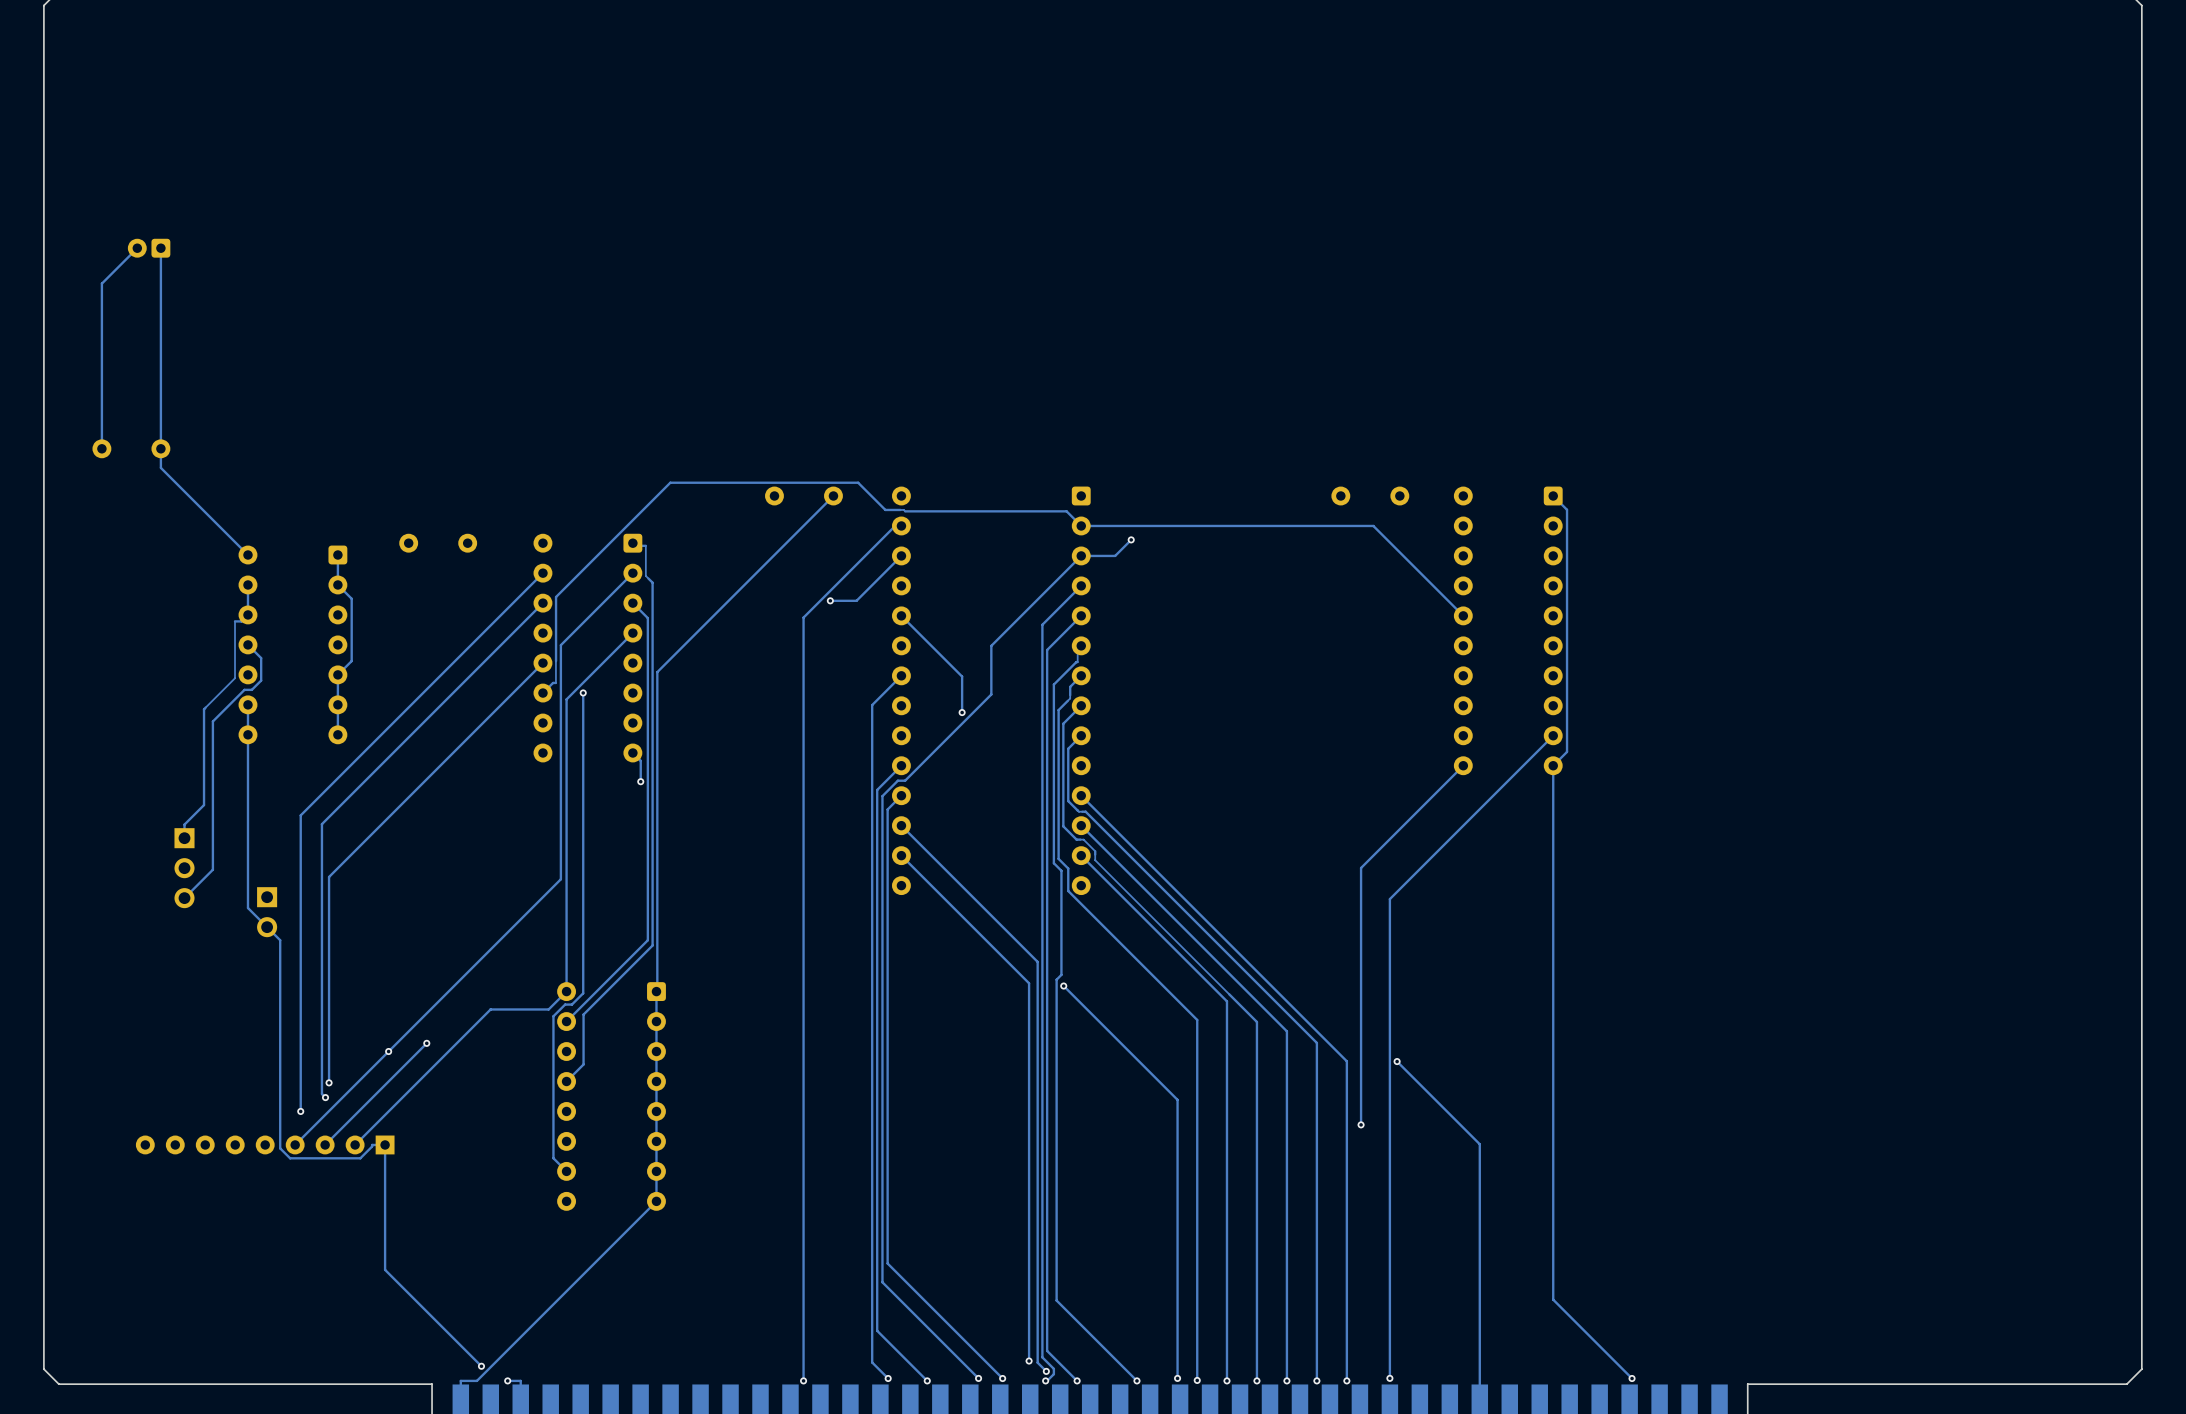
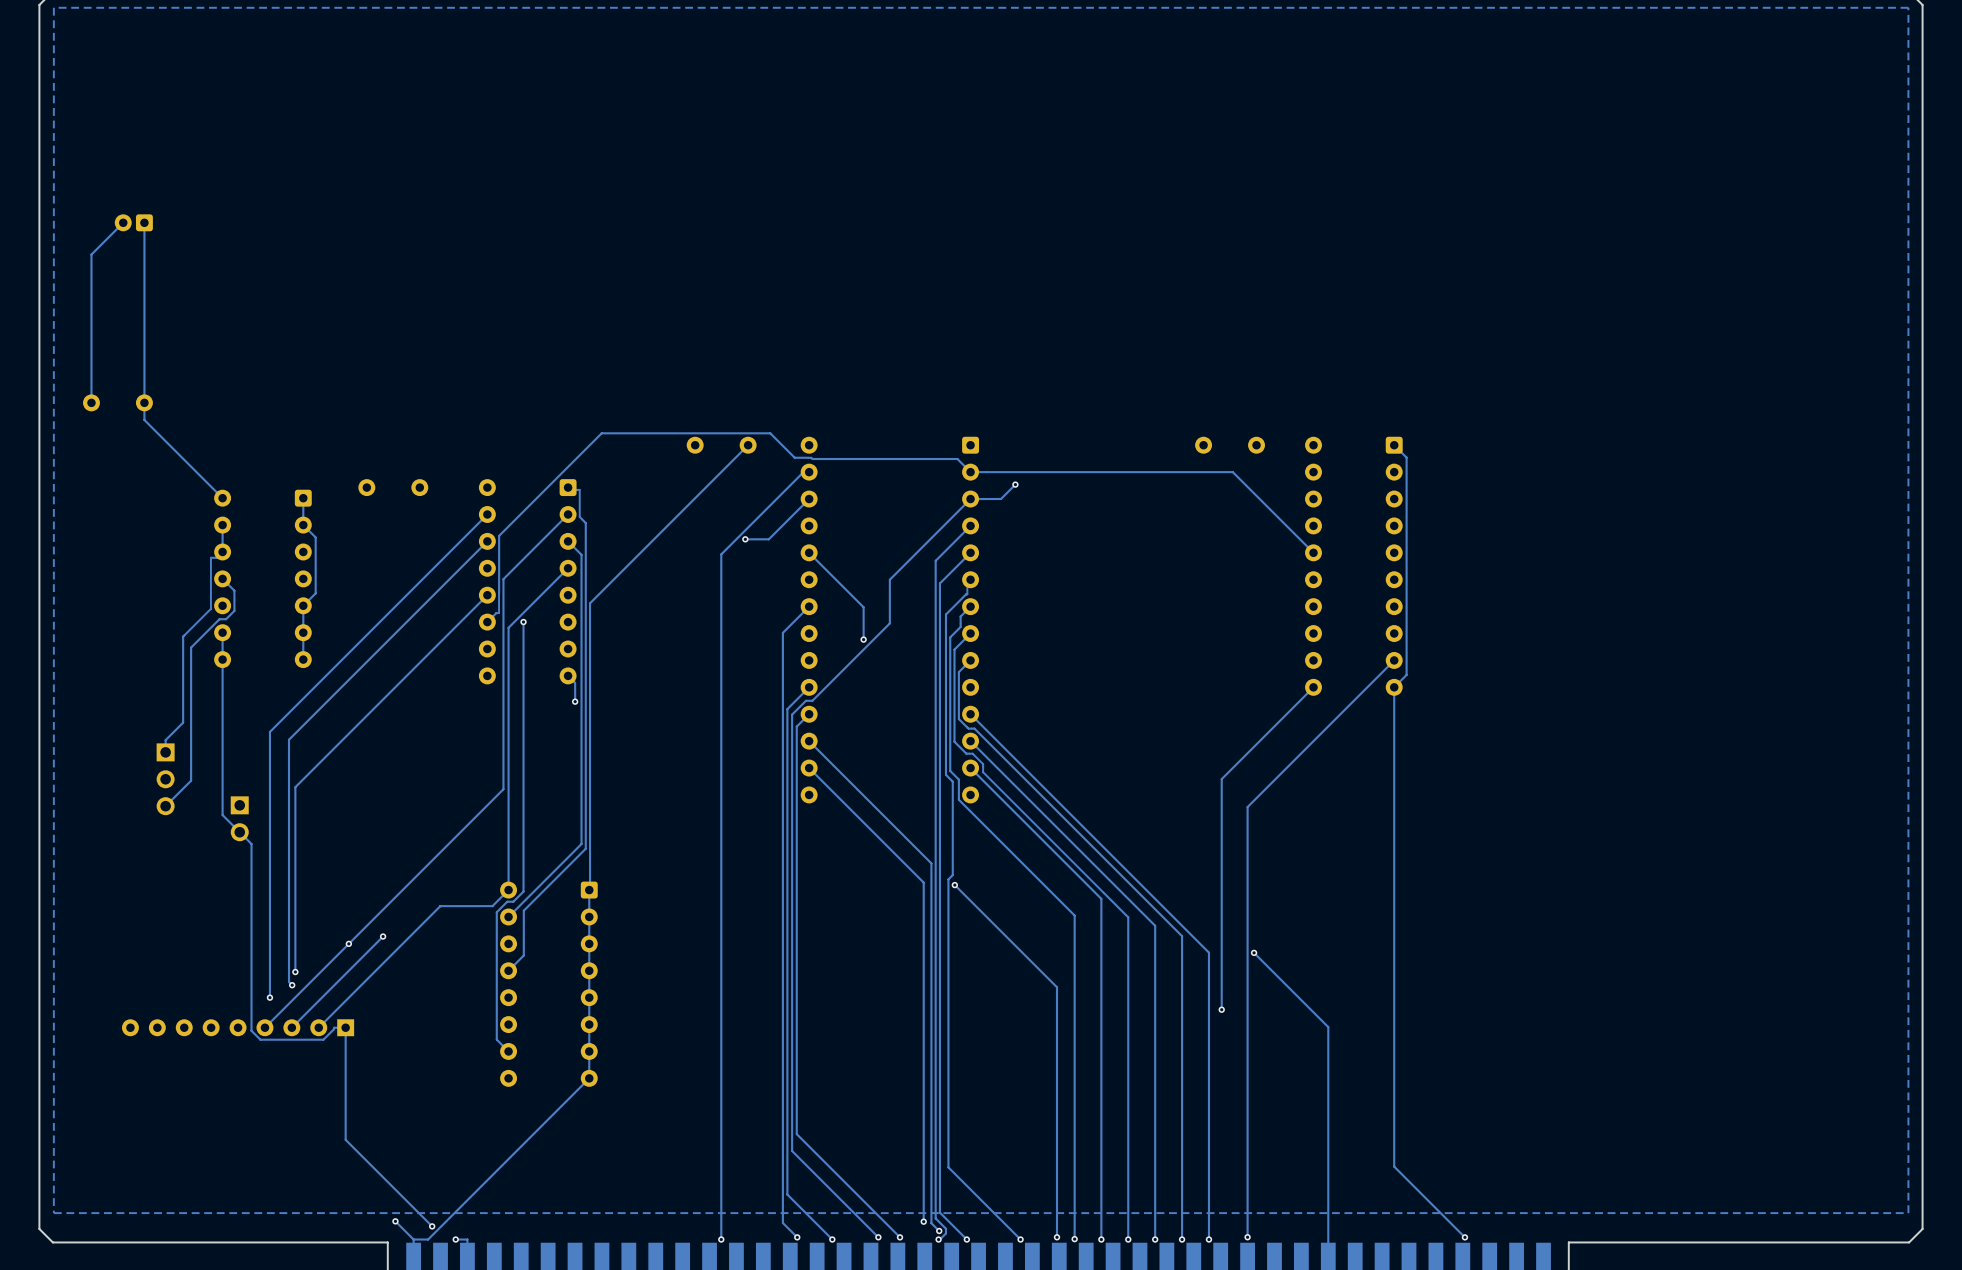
zone outline: none -> (1908, 7) (53, 7) (53, 1213) (1908, 1213) (1908, 7)
track: none -> (395, 1221) (413, 1239)
via: none -> (395, 1221)

